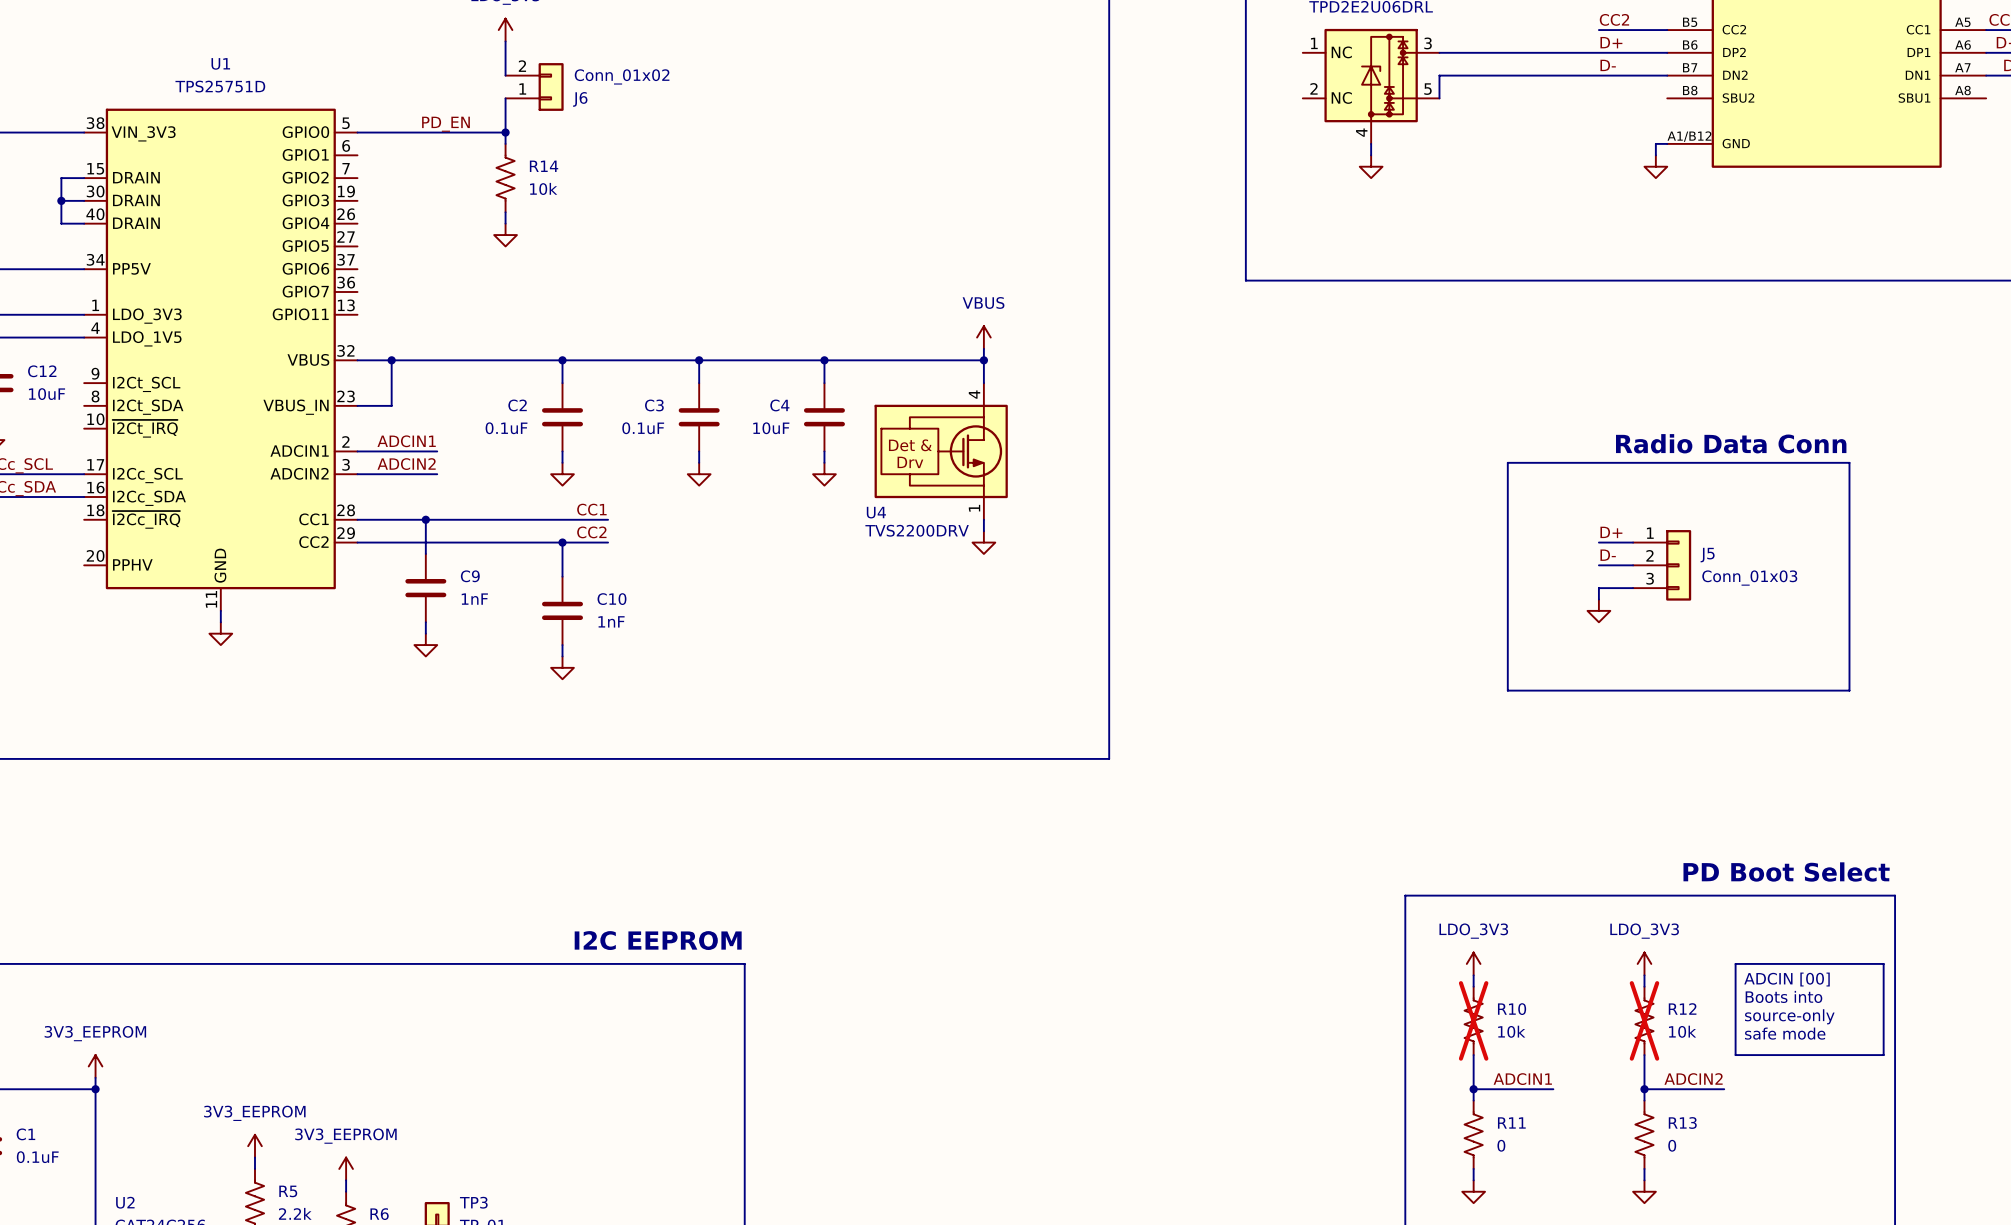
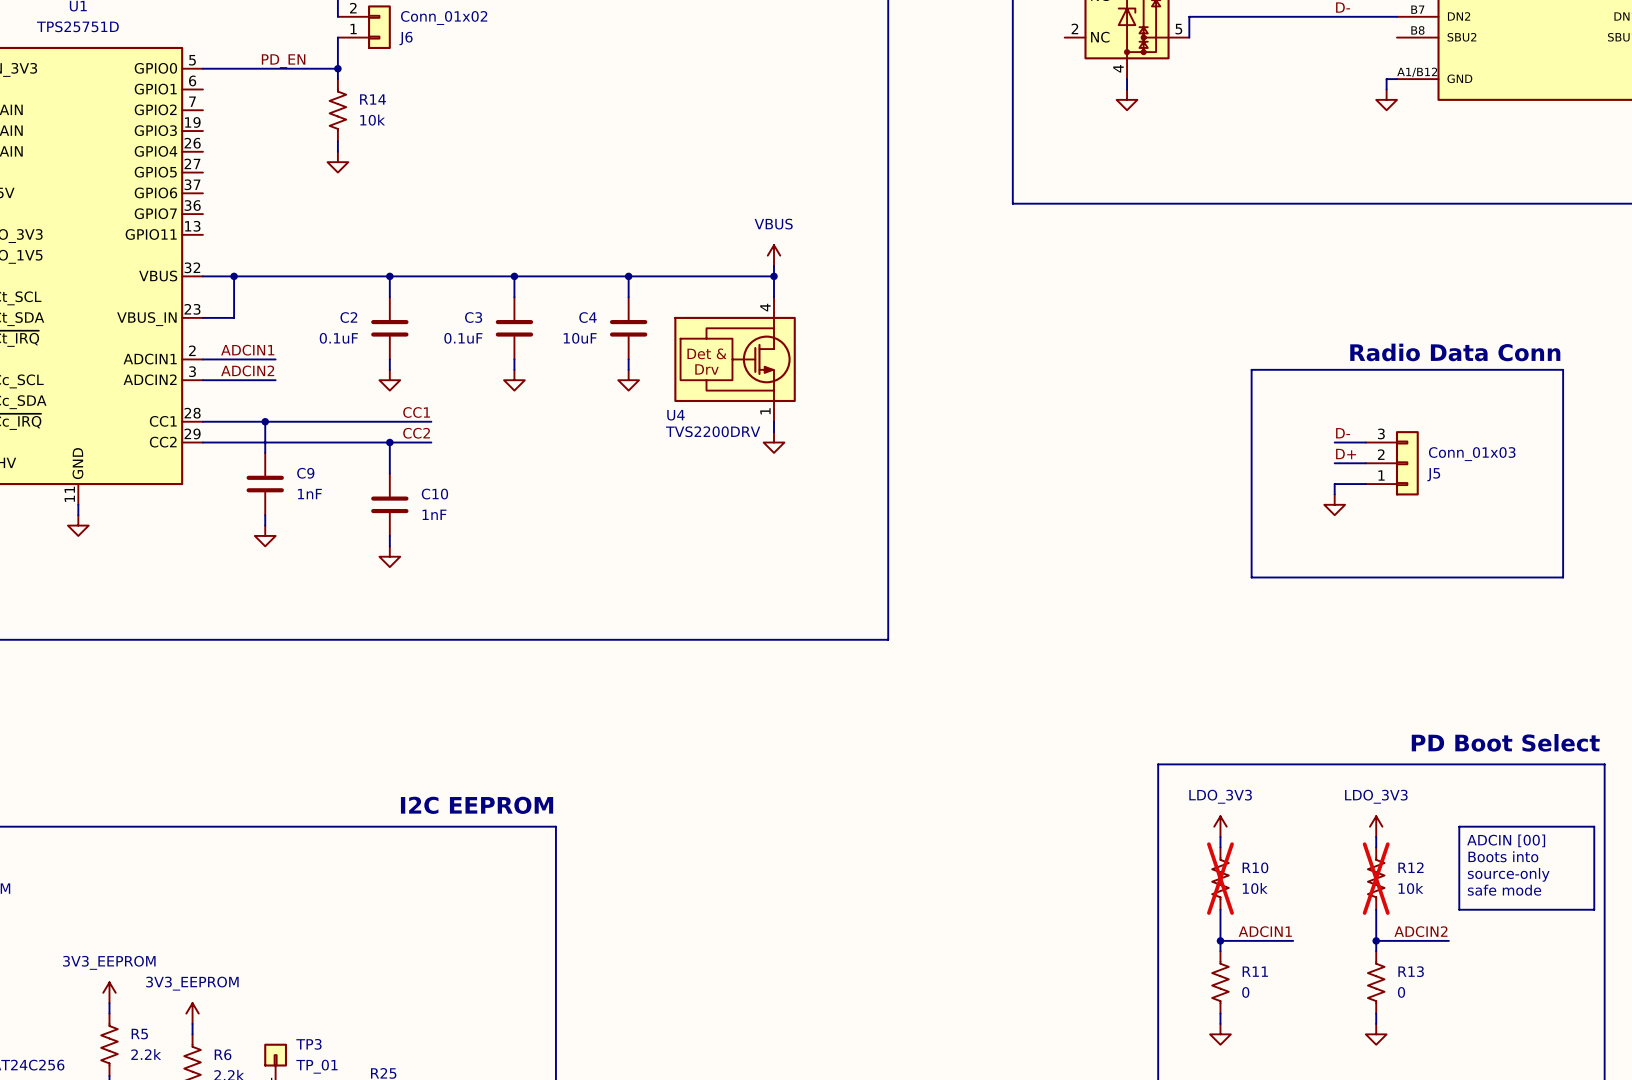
label: D+ (1611, 532) -> D- (1343, 433)
label: D- (1608, 555) -> D+ (1346, 454)
J5 flip: as is (1678, 565) -> up-down (1407, 463)

